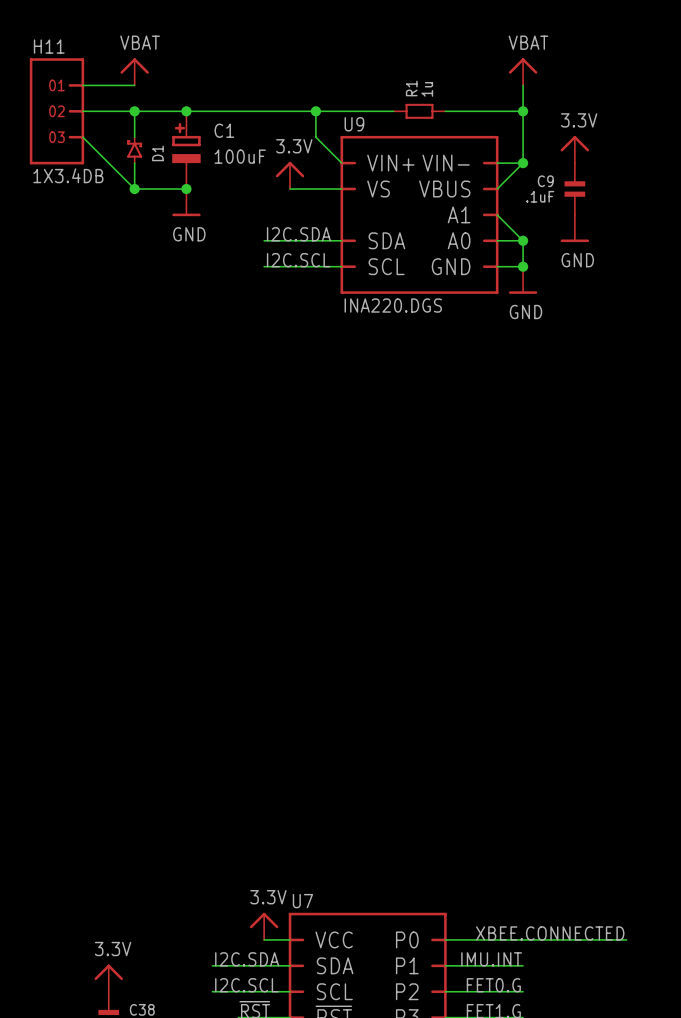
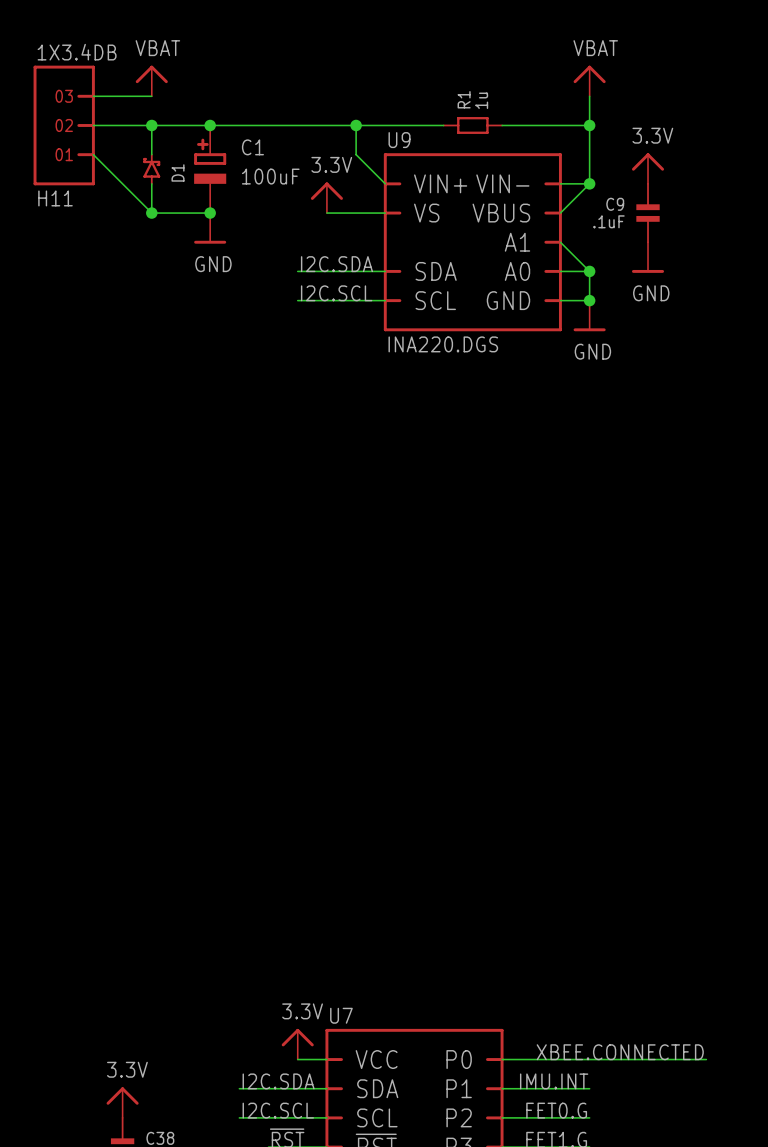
H11 name position: H11 (49, 46) -> H11 (55, 198)
H11 text: 01 (56, 85) -> 03 (64, 96)
H11 text: 03 (56, 137) -> 01 (64, 154)
H11 value position: 1X3.4DB (68, 175) -> 1X3.4DB (77, 52)

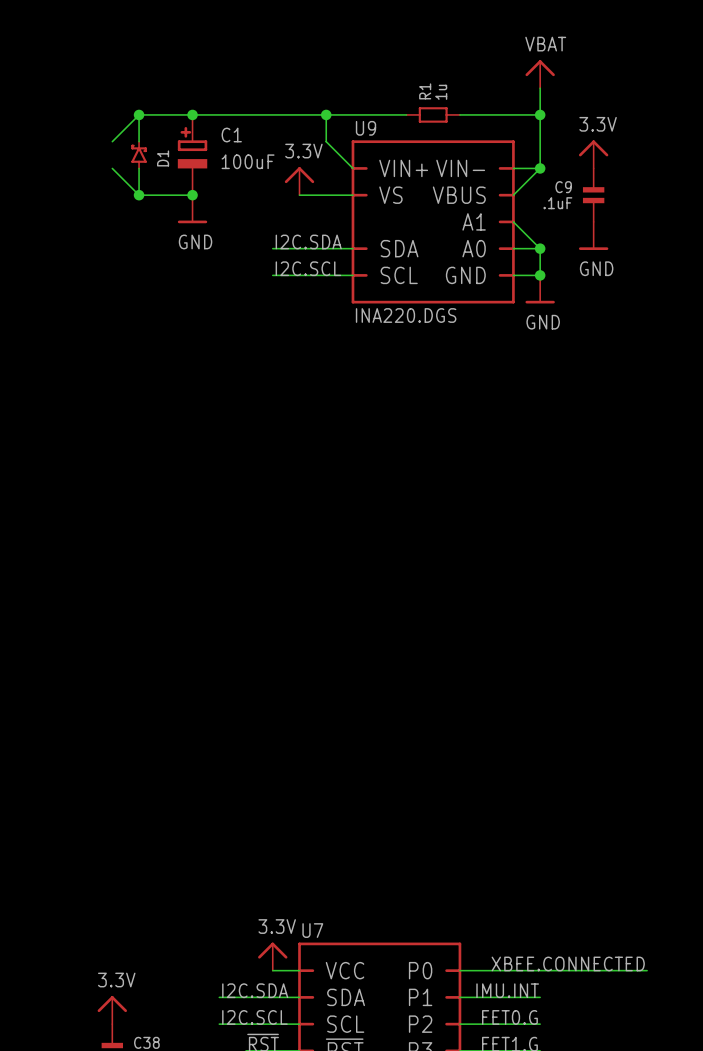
power symbol: VBAT (151, 80) -> none
wire: (93, 96) (151, 96) -> none
H11: 1X3.4DB (64, 125) -> none
wire: (93, 125) (151, 125) -> (112, 141) (139, 114)
wire: (93, 154) (122, 183) -> none

